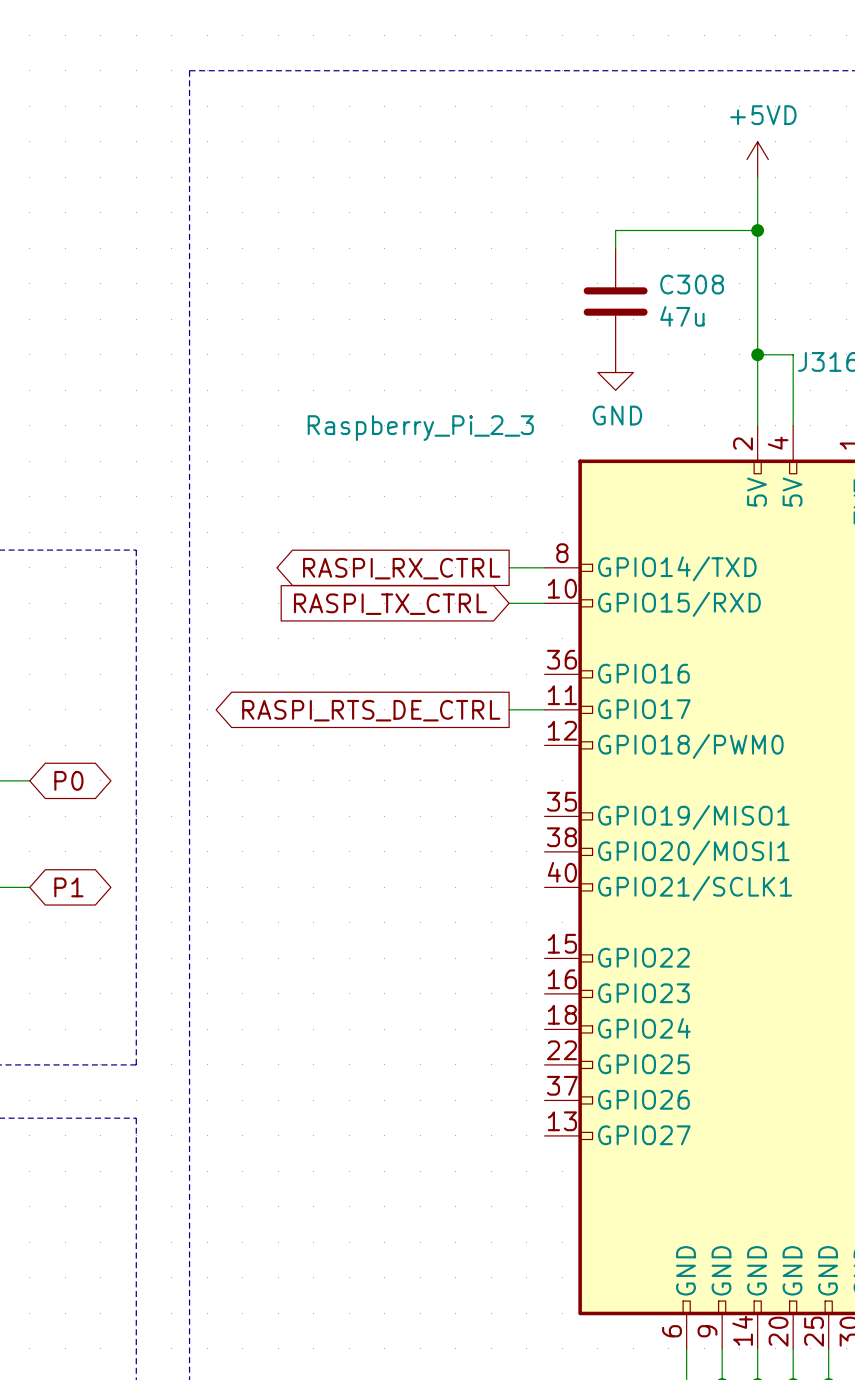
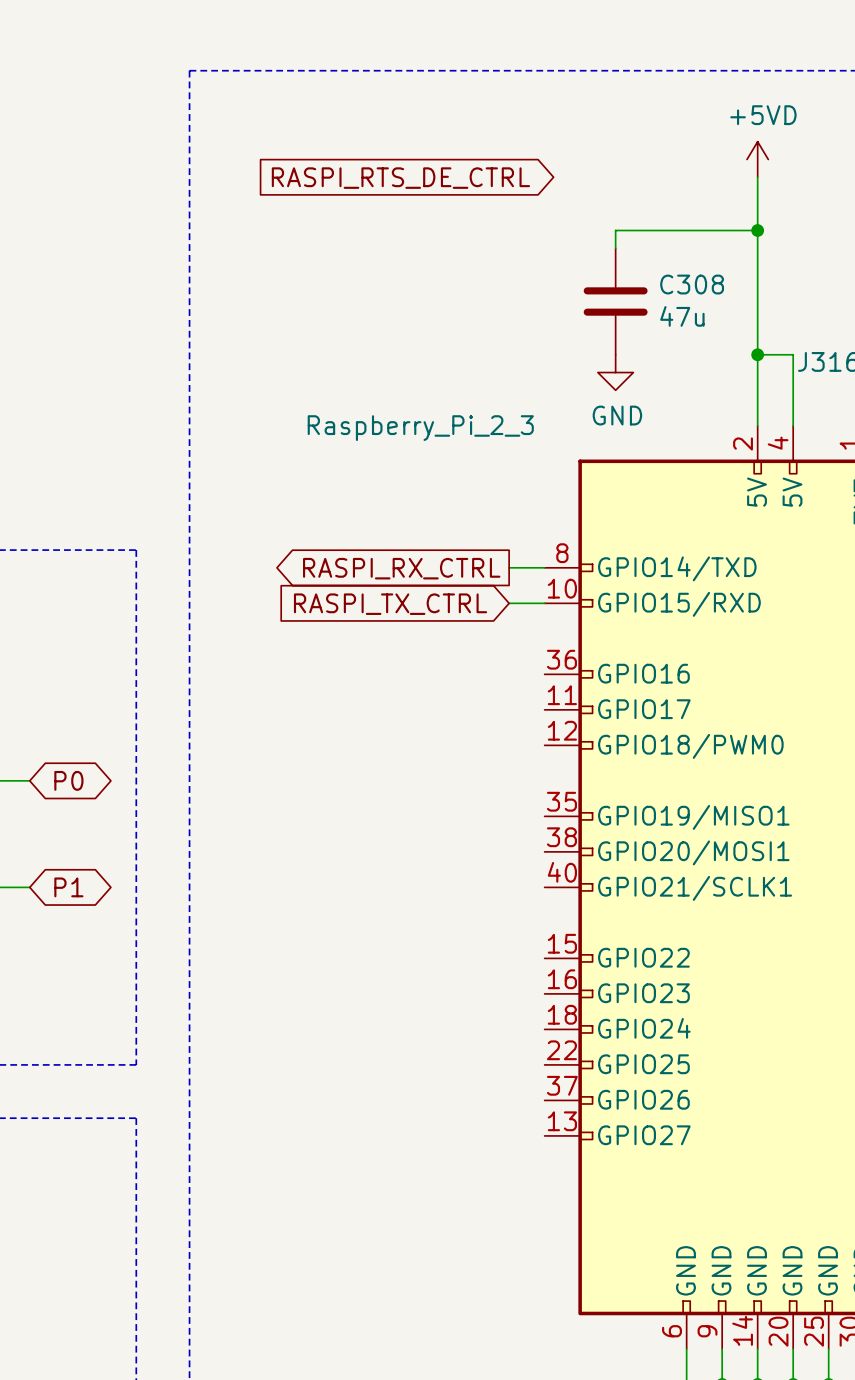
global label: none -> RASPI_RTS_DE_CTRL (400, 178)
wire: (509, 709) (544, 709) -> none
global label: RASPI_RTS_DE_CTRL (371, 710) -> none

